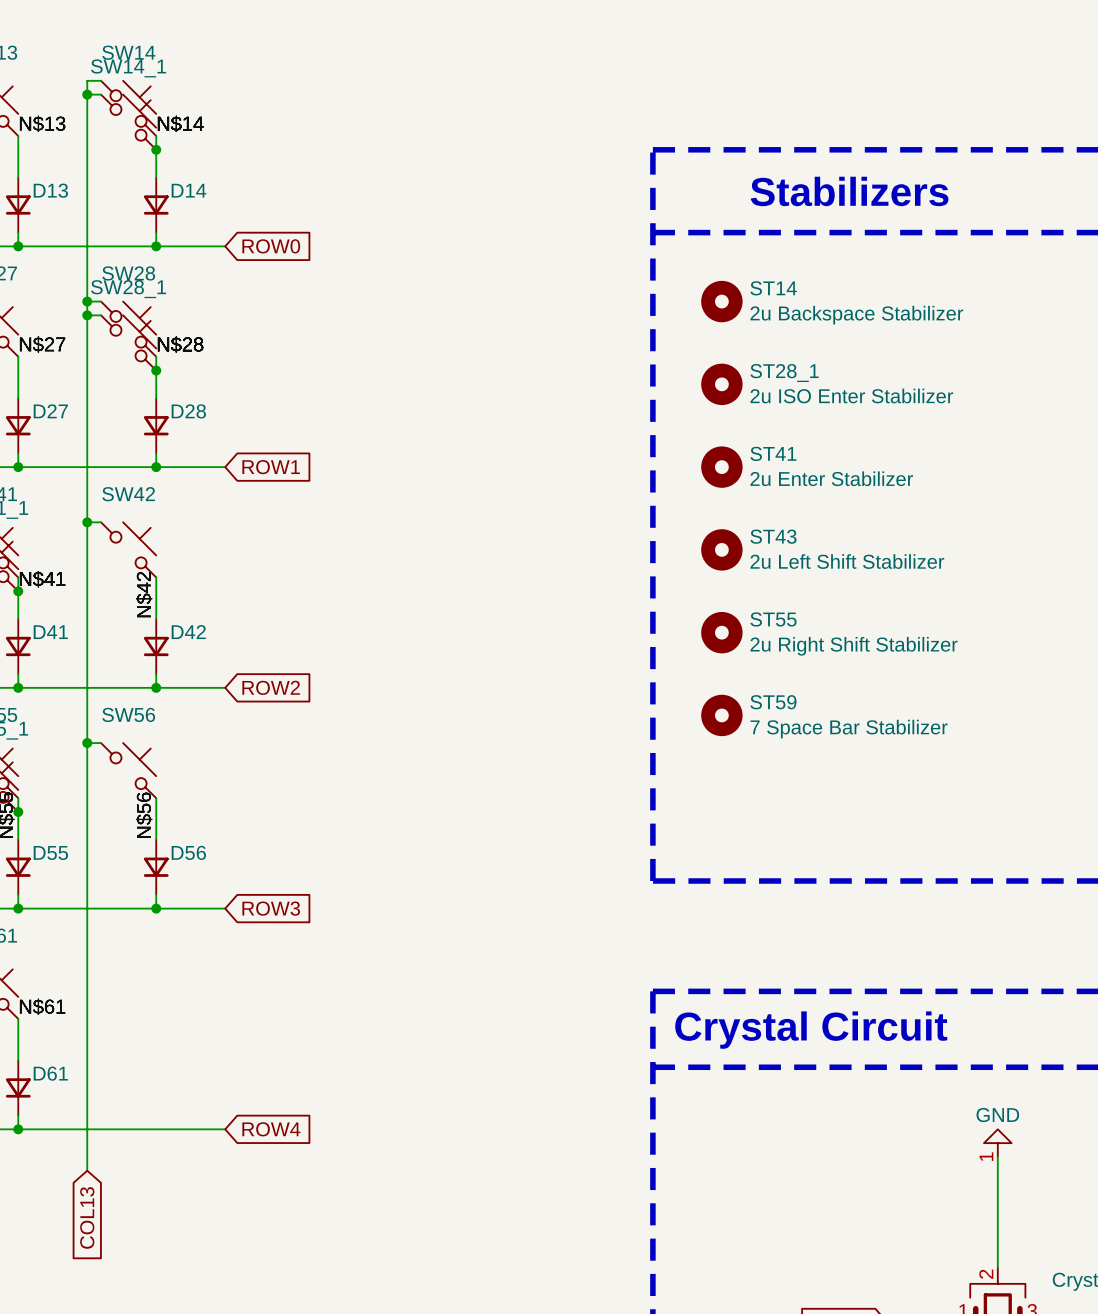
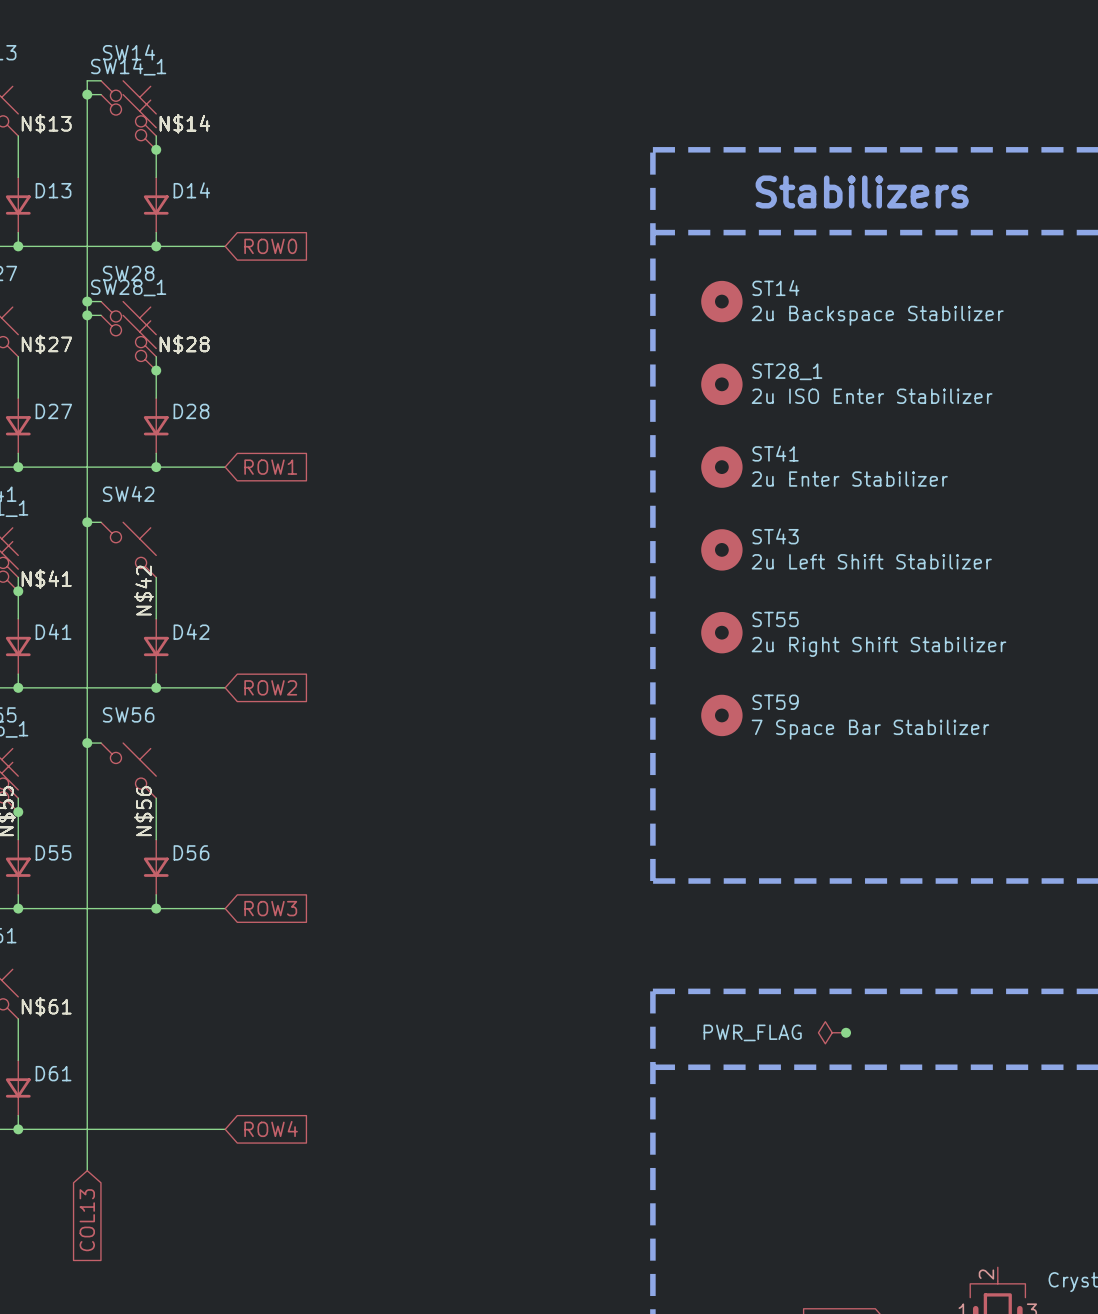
text: Crystal Circuit (811, 1030) -> none
power symbol: none -> PWR_FLAG (832, 1032)
junction: none -> (846, 1032)
power symbol: GND (997, 1143) -> none
wire: (997, 1156) (997, 1267) -> none

